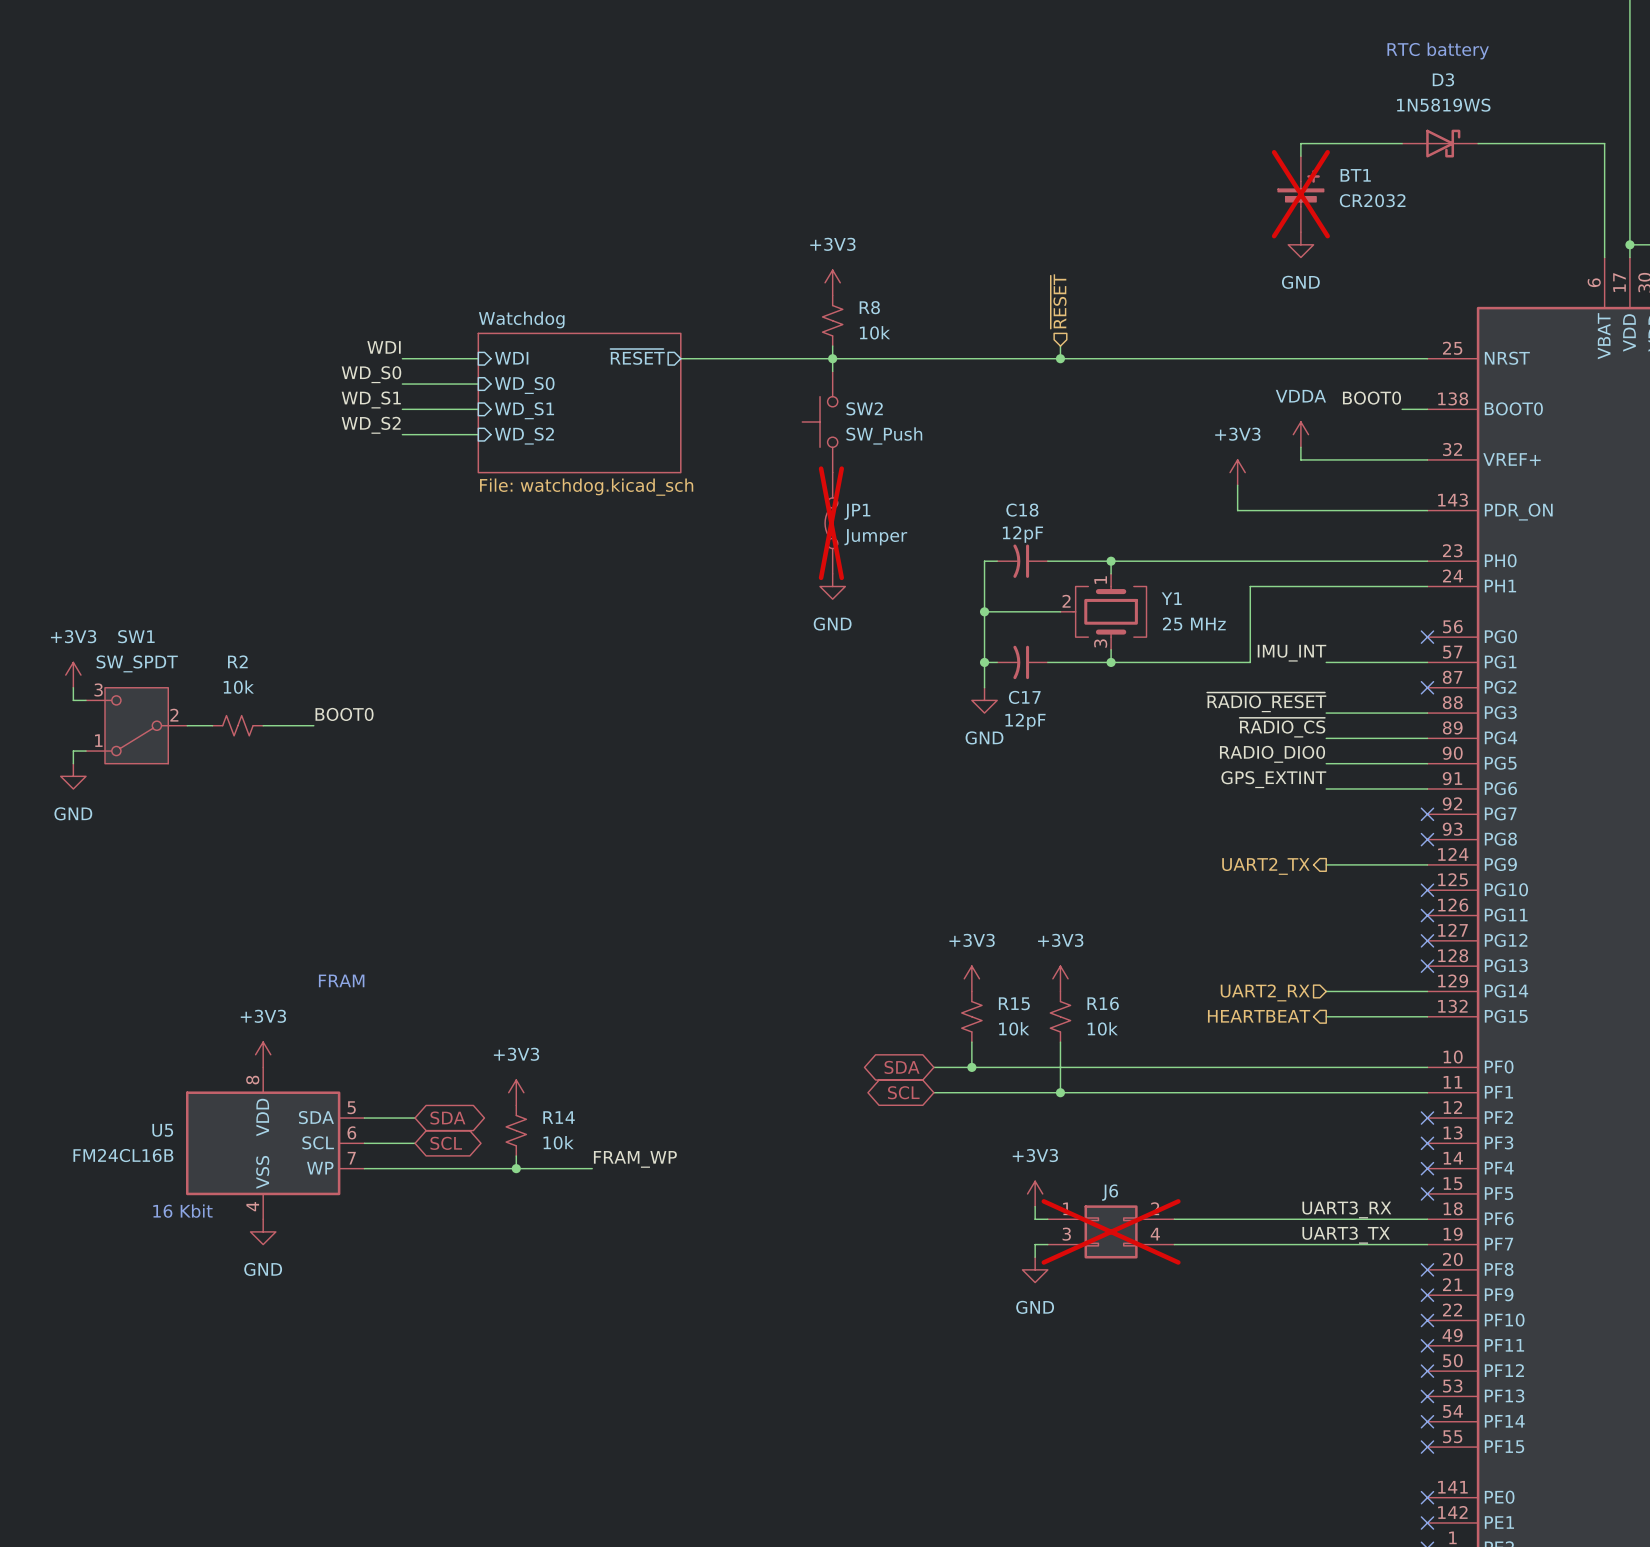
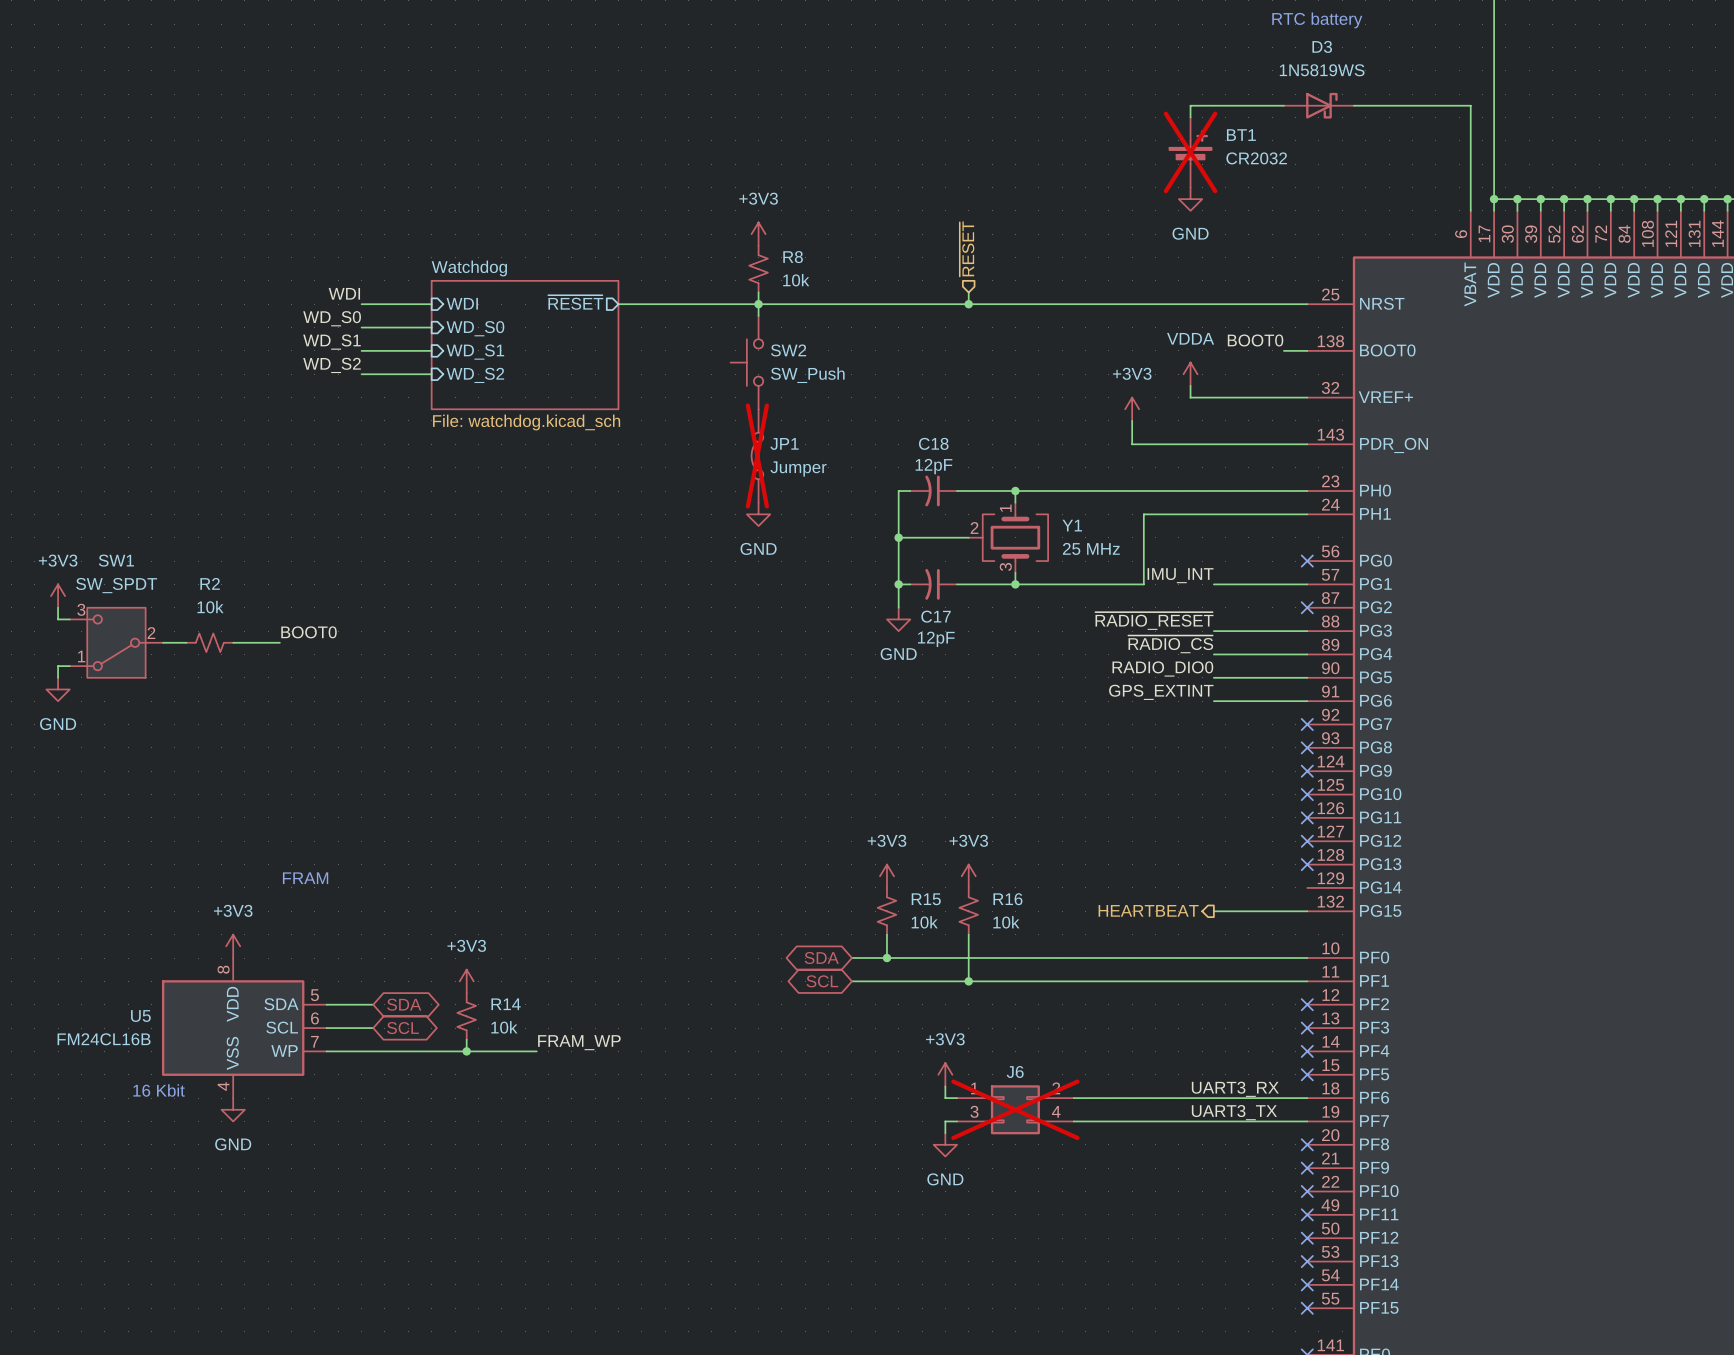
wire: (1326, 864) (1427, 864) -> none
no-connect mark: none -> (1307, 771)
hierarchical label: UART2_TX (1265, 866) -> none
wire: (1326, 991) (1427, 991) -> none
hierarchical label: UART2_RX (1265, 992) -> none

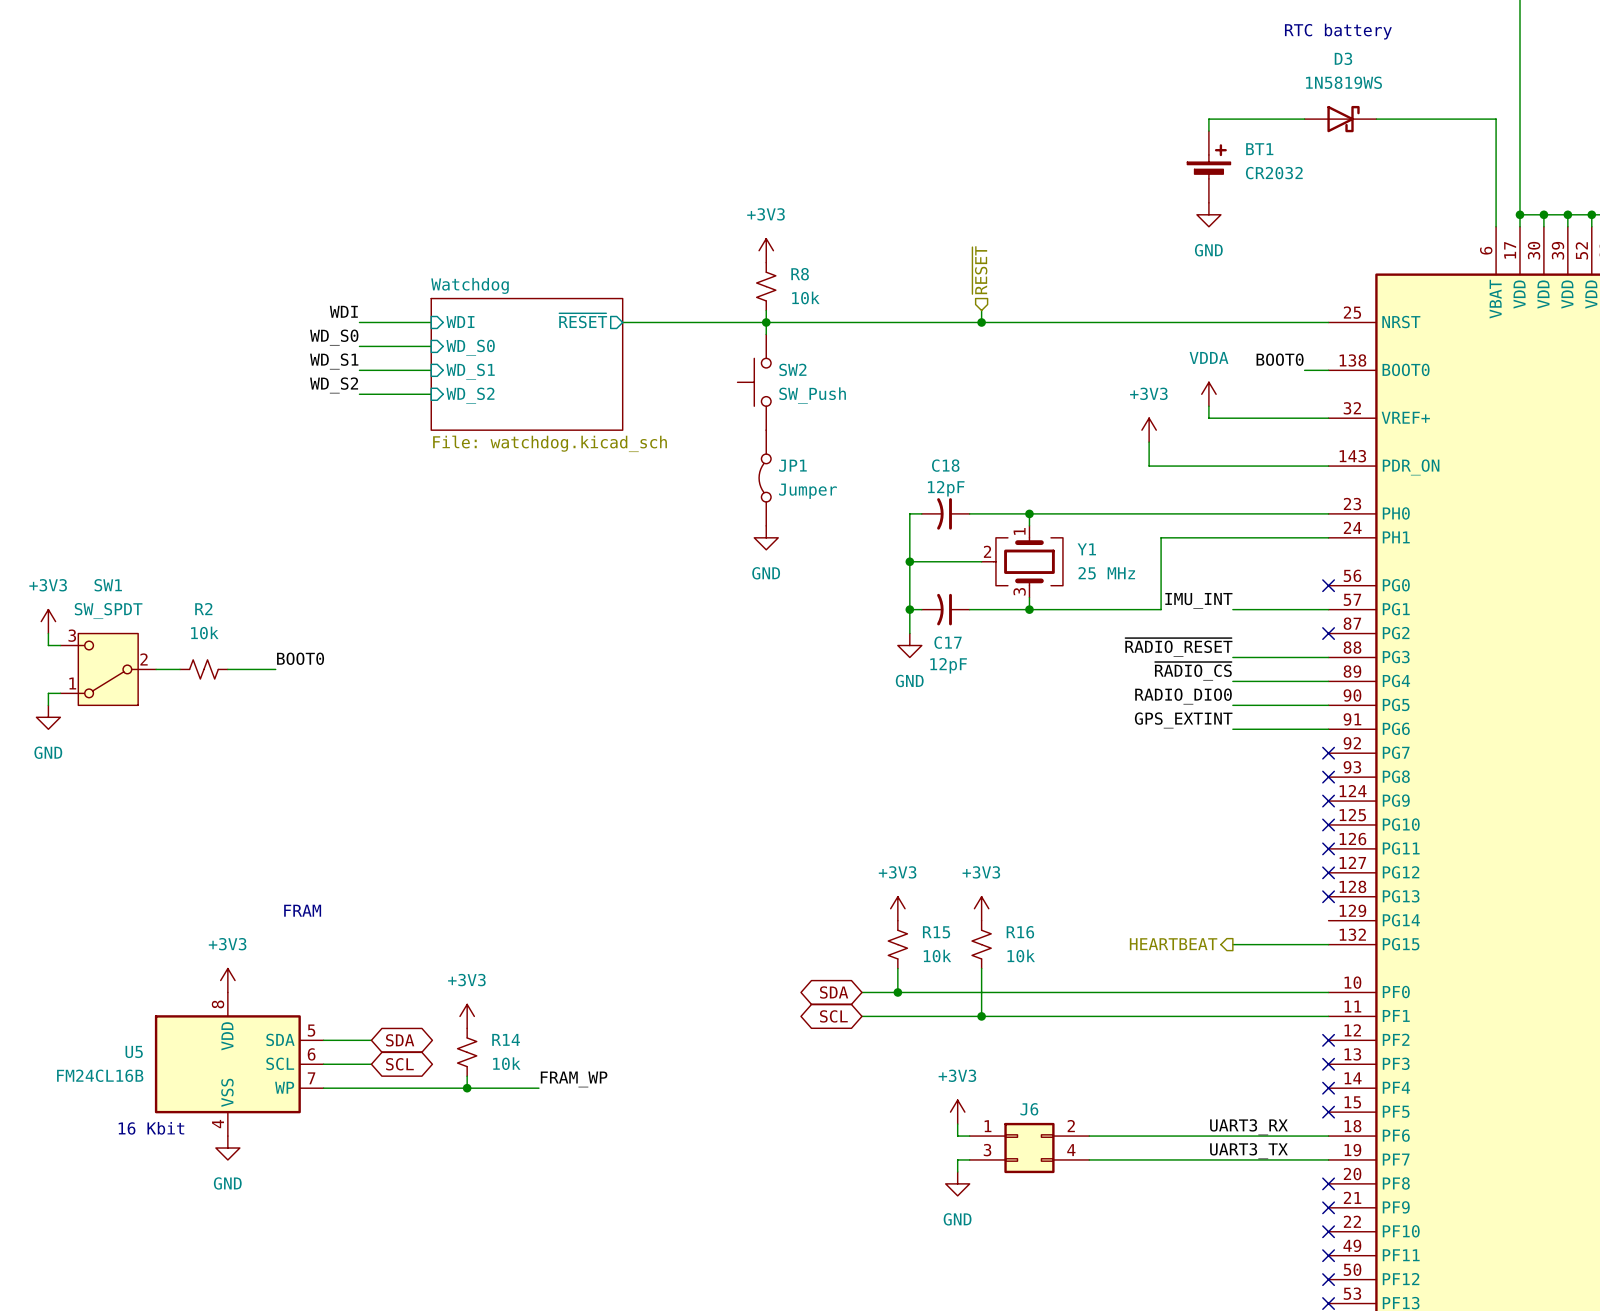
BT1 do-not-place cross: (1190, 152) -> none
JP1 do-not-place cross: (757, 455) -> none
J6 do-not-place cross: (1015, 1109) -> none

